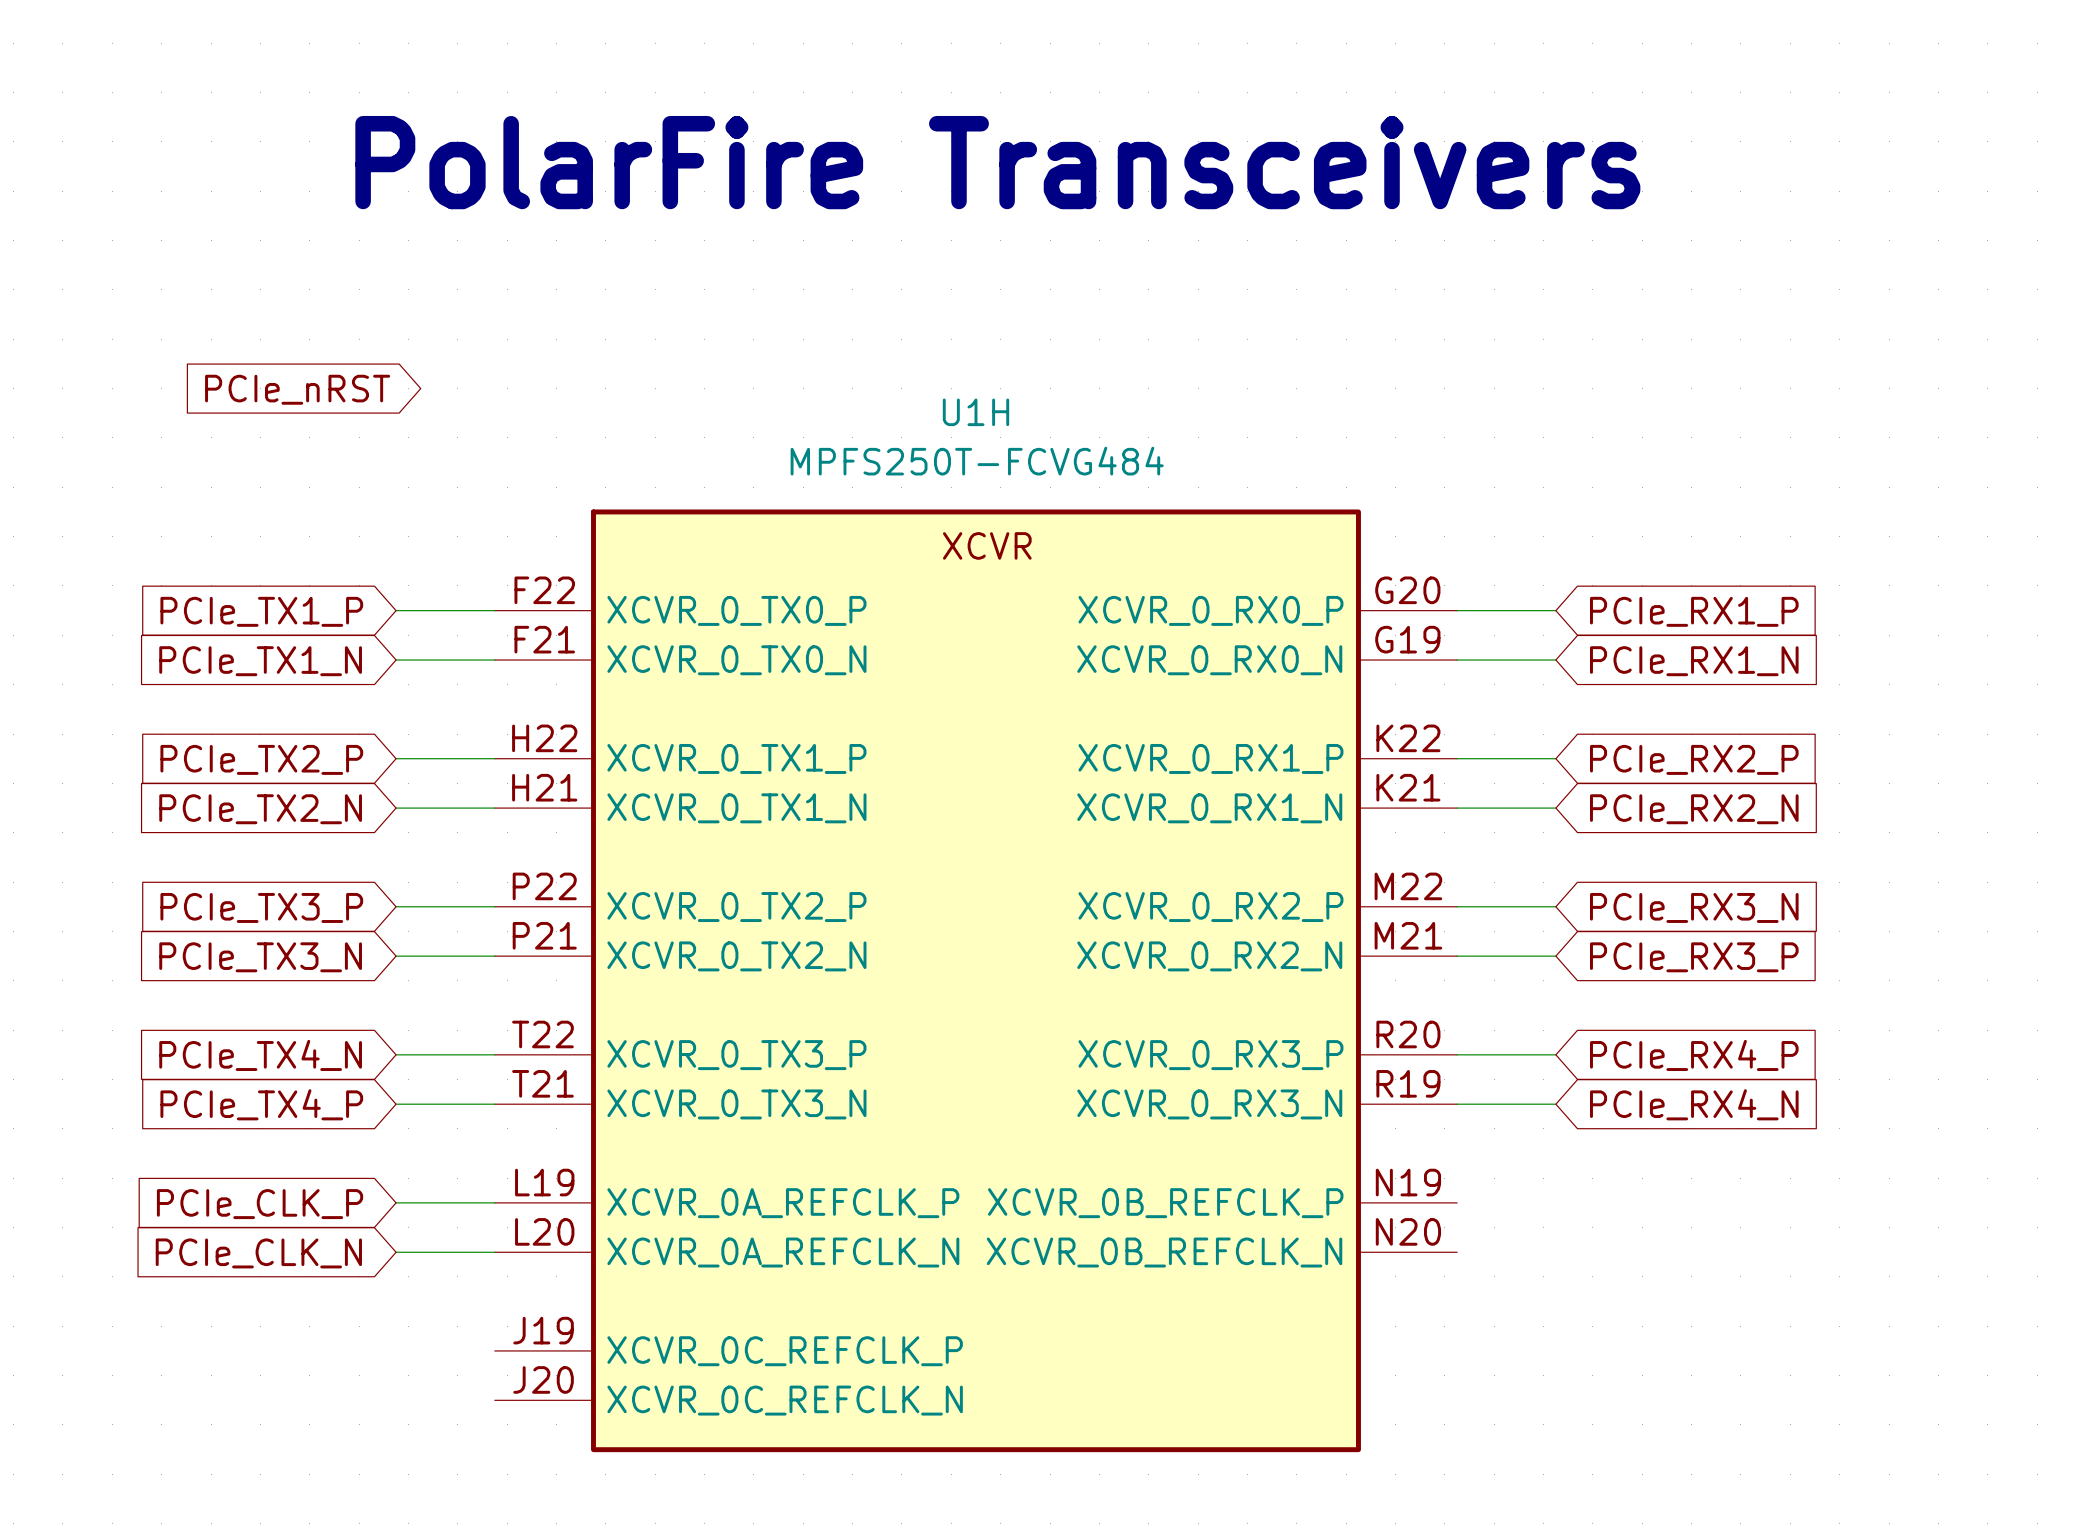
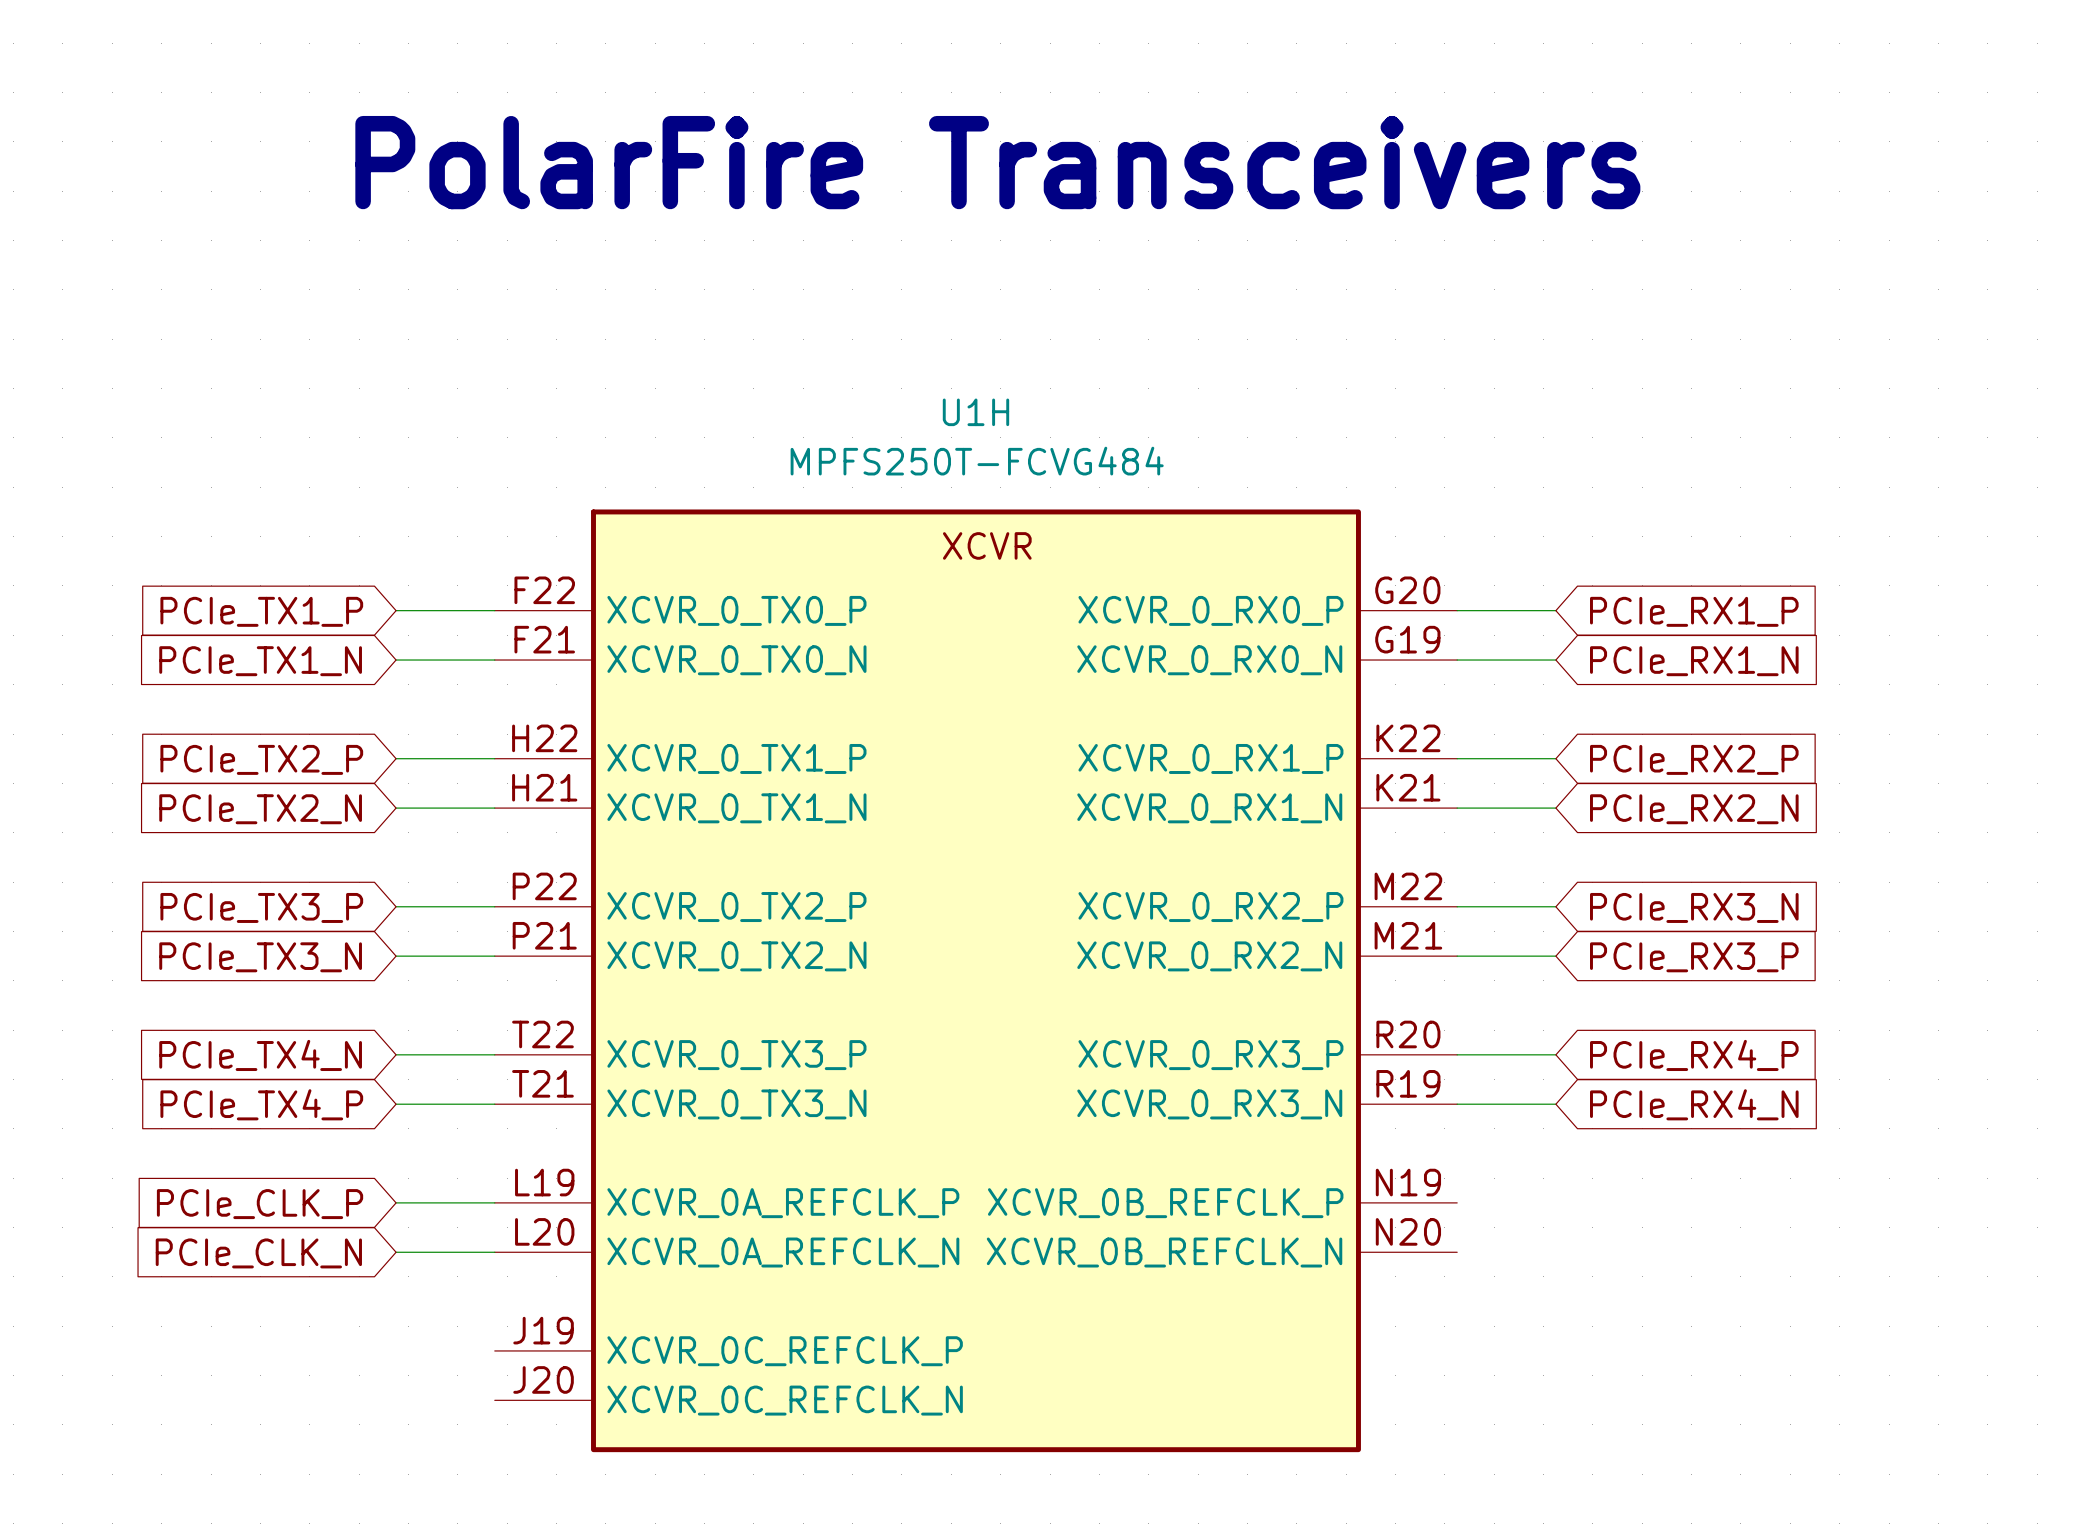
global label: PCIe_nRST (297, 389) -> none

